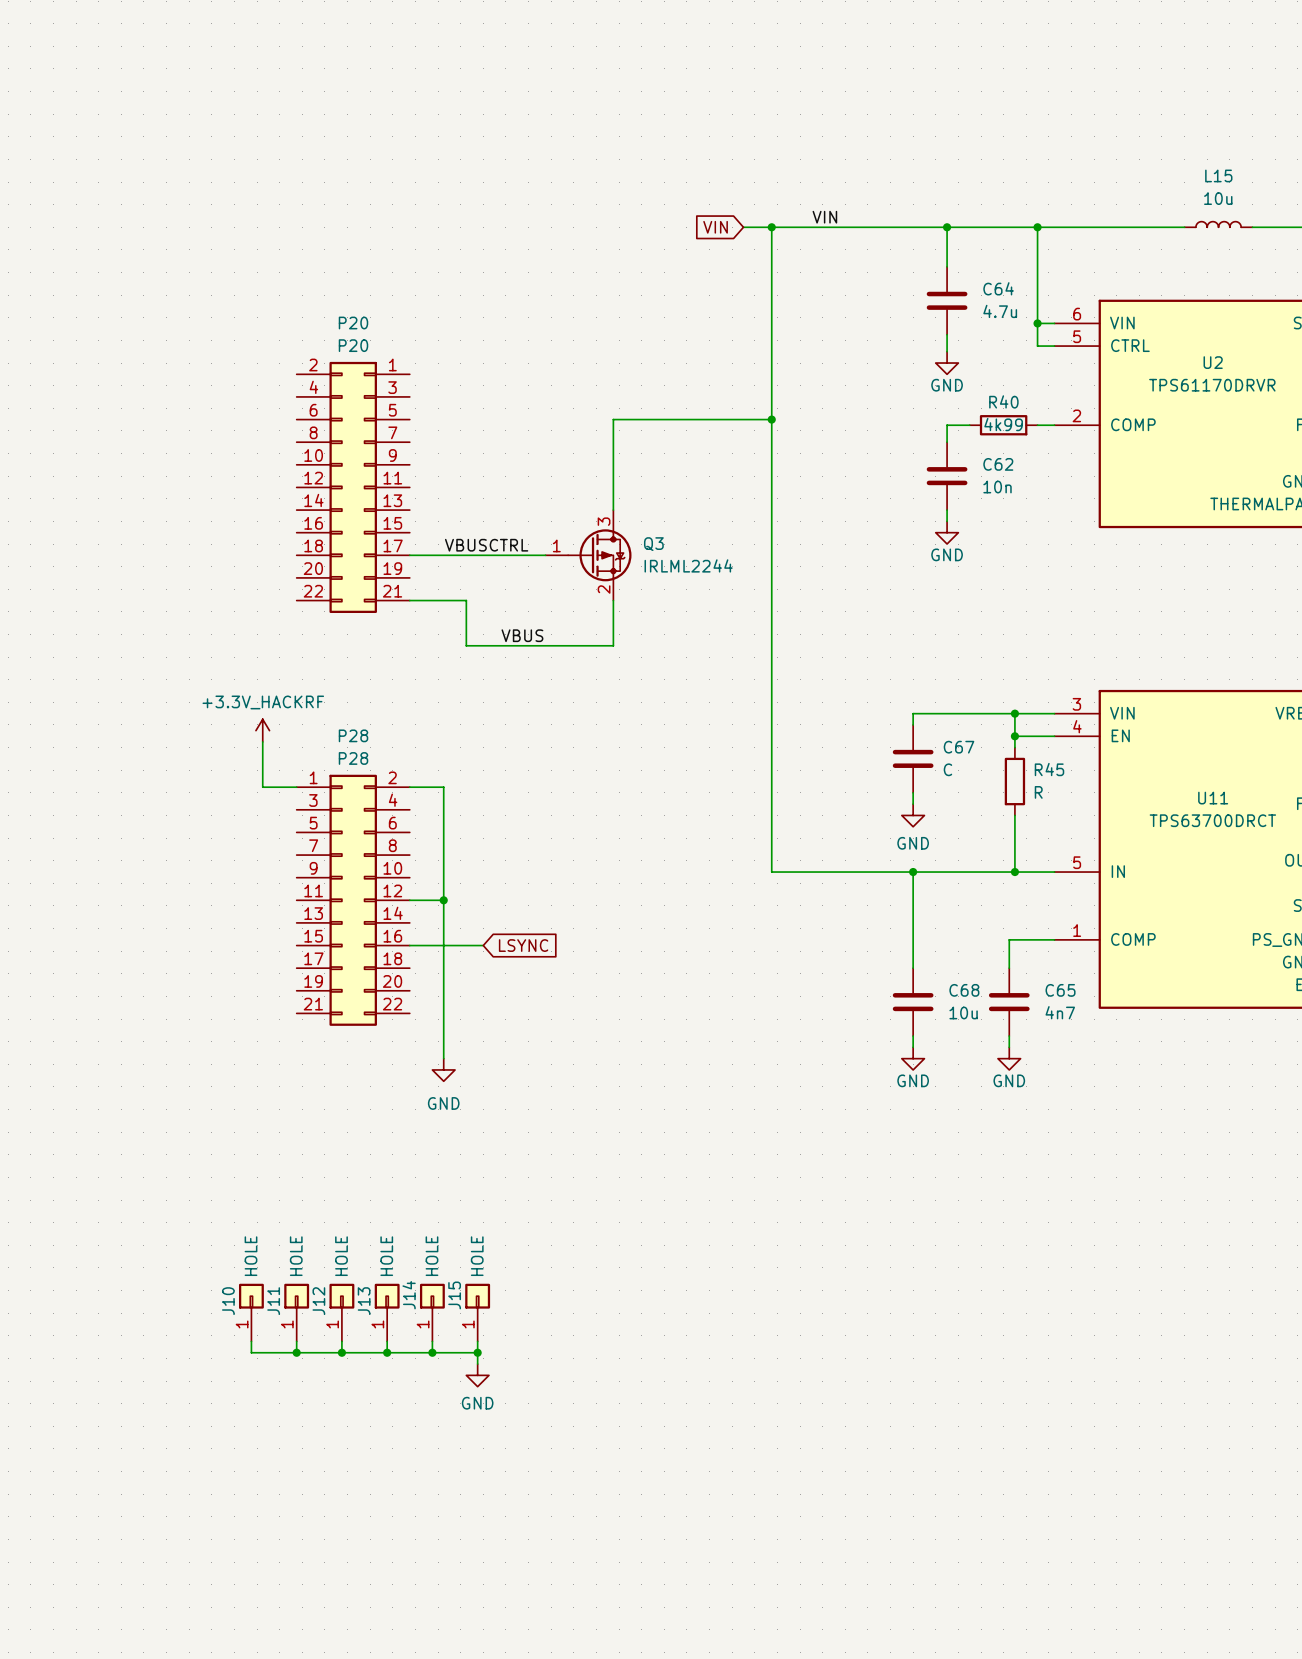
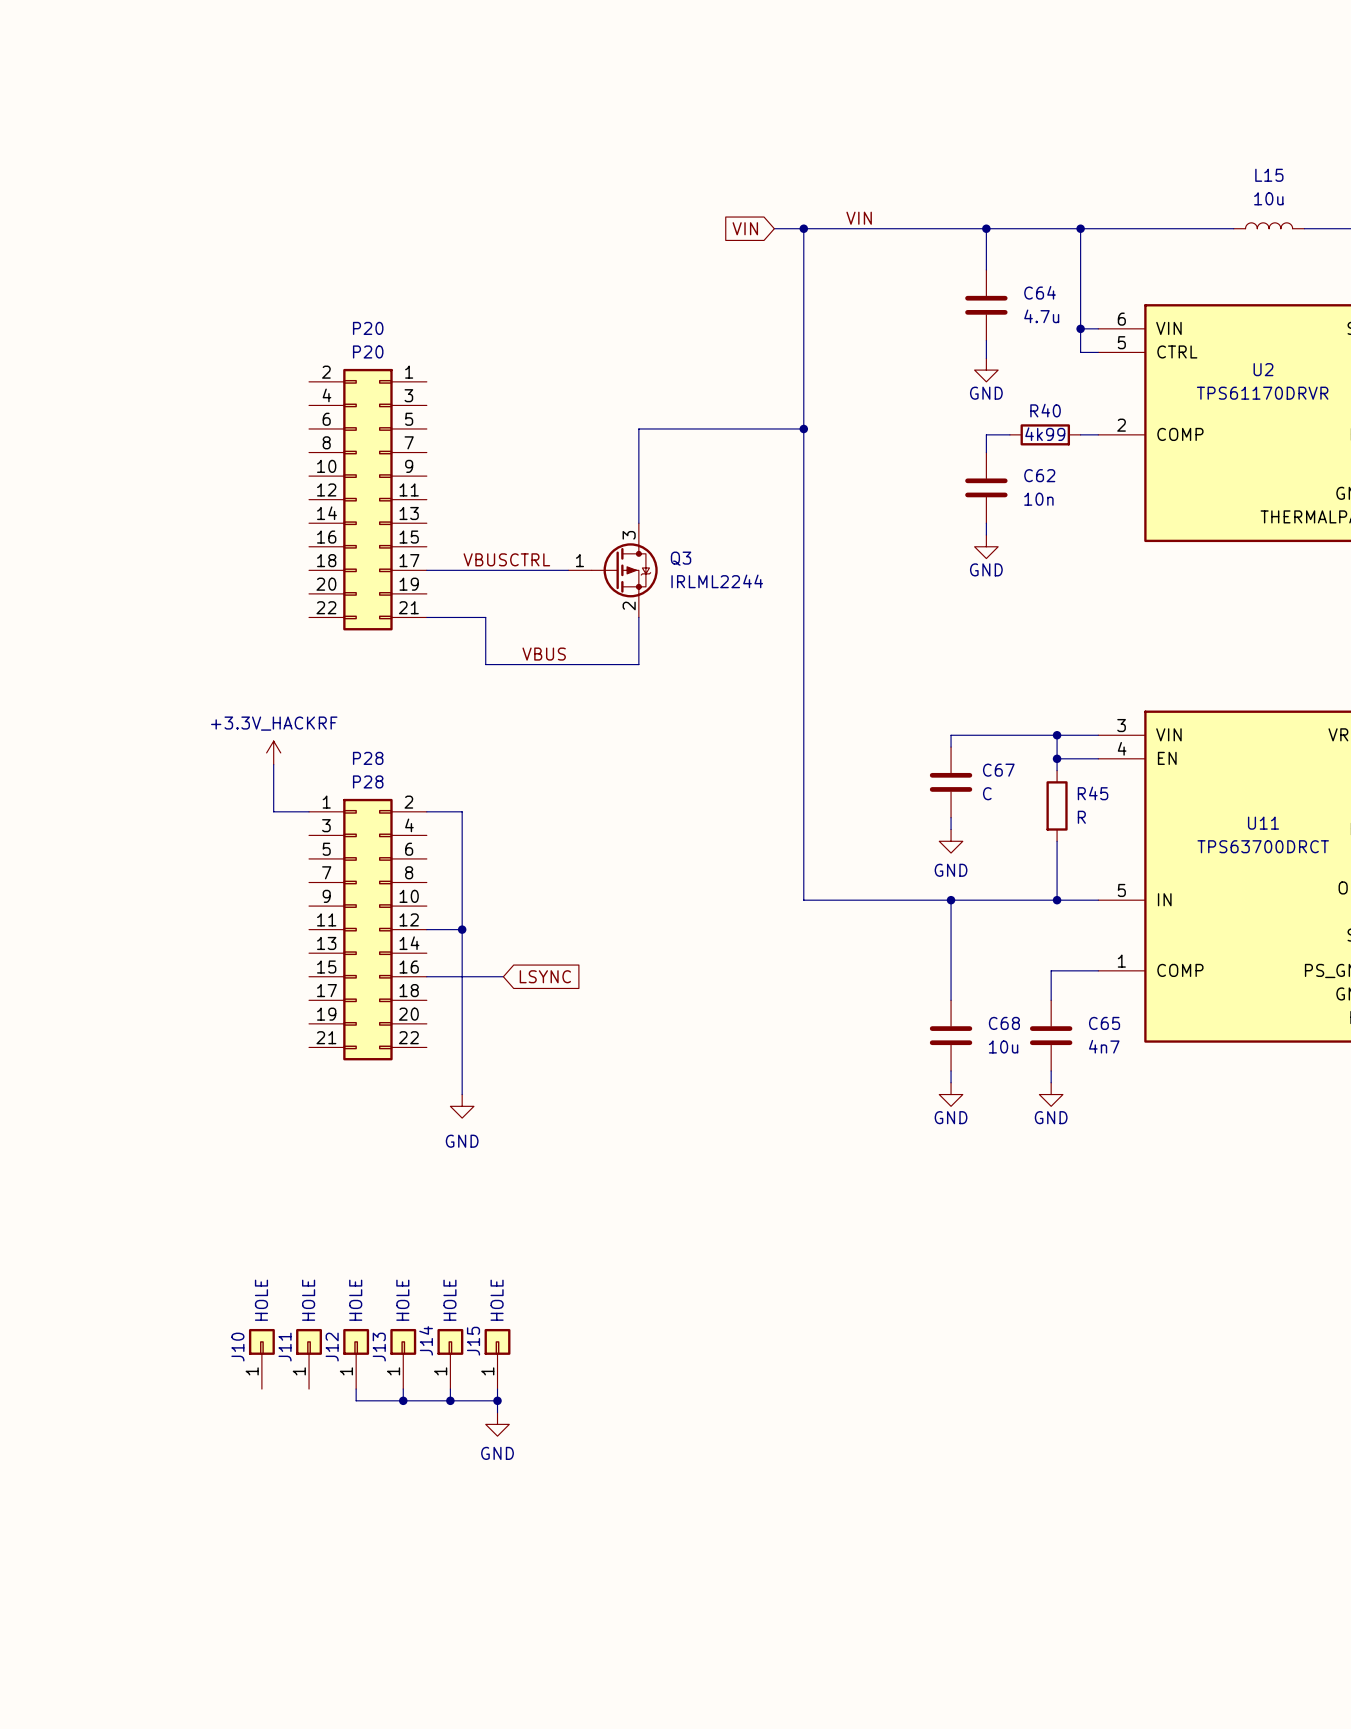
wire: (251, 1341) (251, 1352) (341, 1352) -> none
wire: (296, 1341) (296, 1352) -> none
junction: (296, 1352) -> none
junction: (341, 1352) -> none

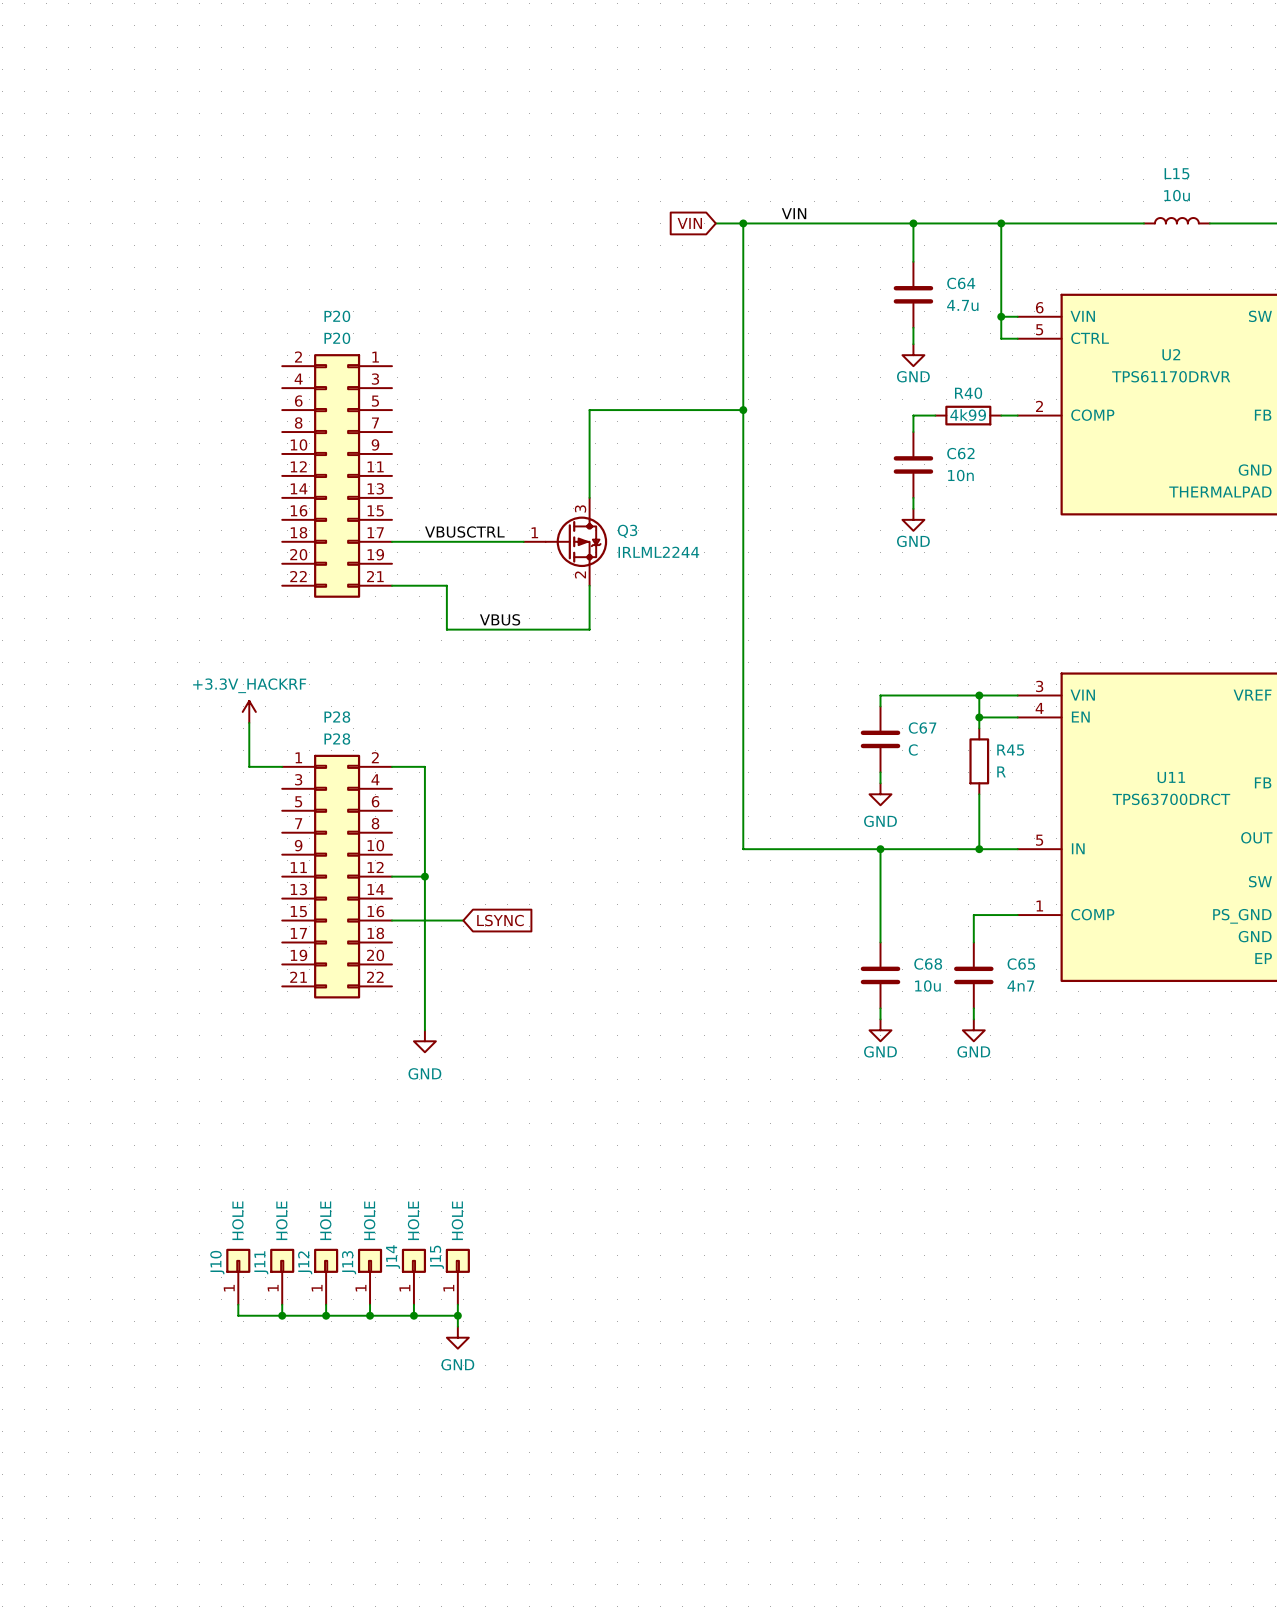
wire: none -> (238, 1304) (238, 1315) (326, 1315)
wire: none -> (282, 1304) (282, 1315)
junction: none -> (282, 1315)
junction: none -> (326, 1315)

